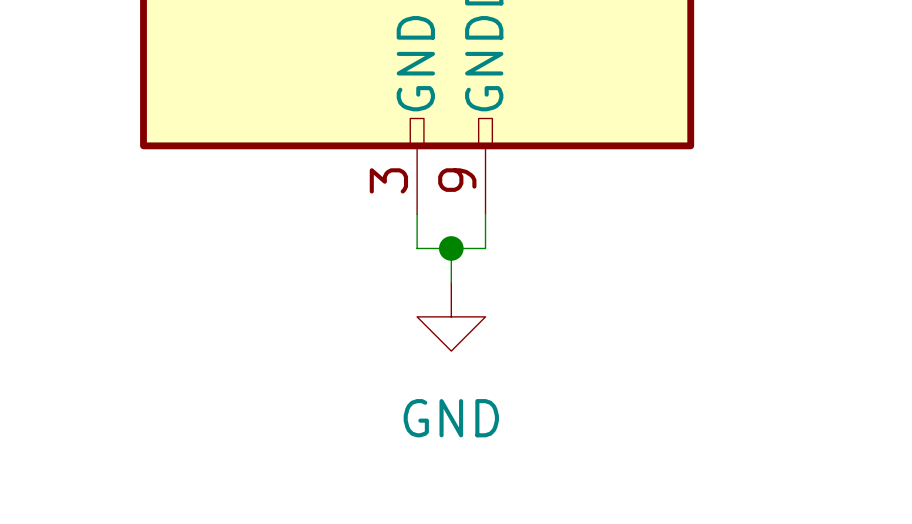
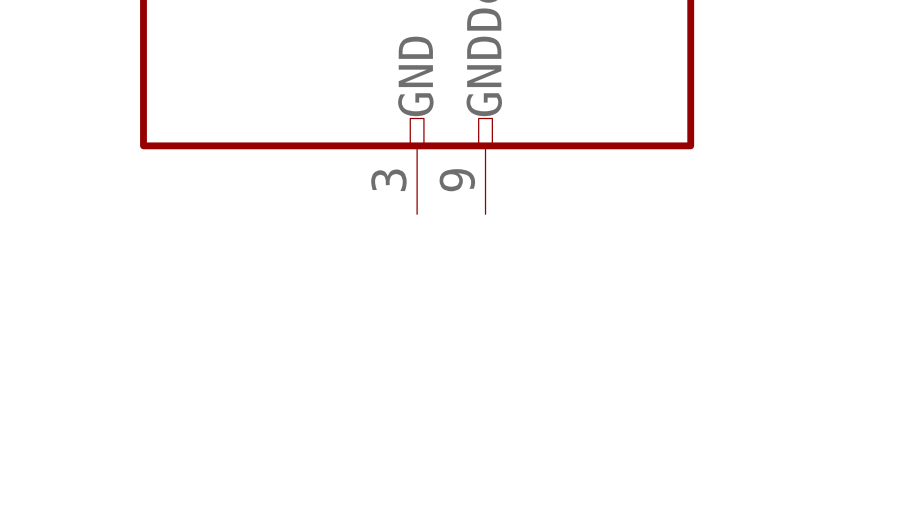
wire: (417, 214) (417, 248) (485, 248) (485, 214) -> none
wire: (451, 248) (451, 282) -> none
junction: (451, 248) -> none
power symbol: GND (451, 316) -> none

